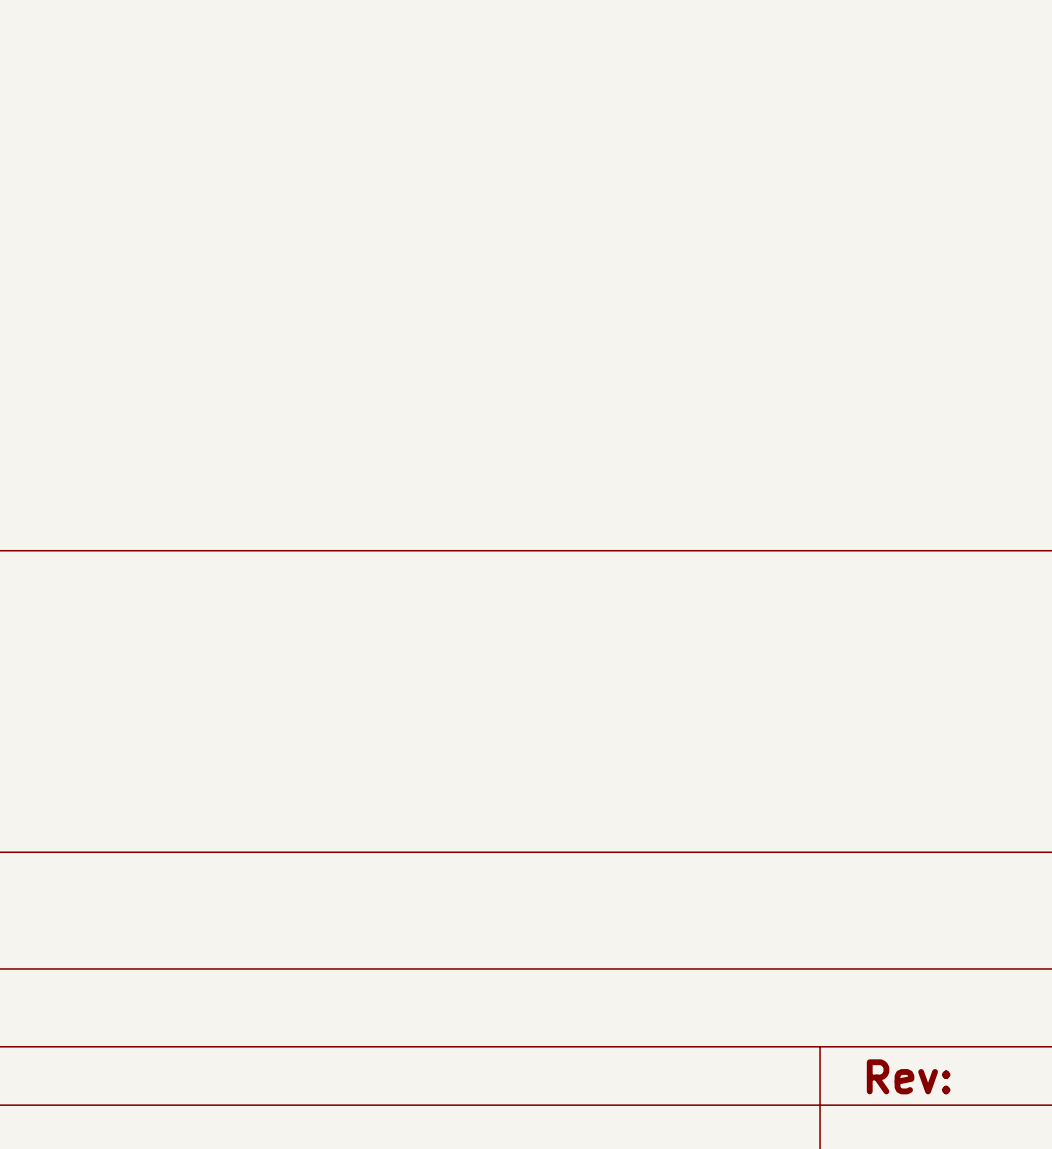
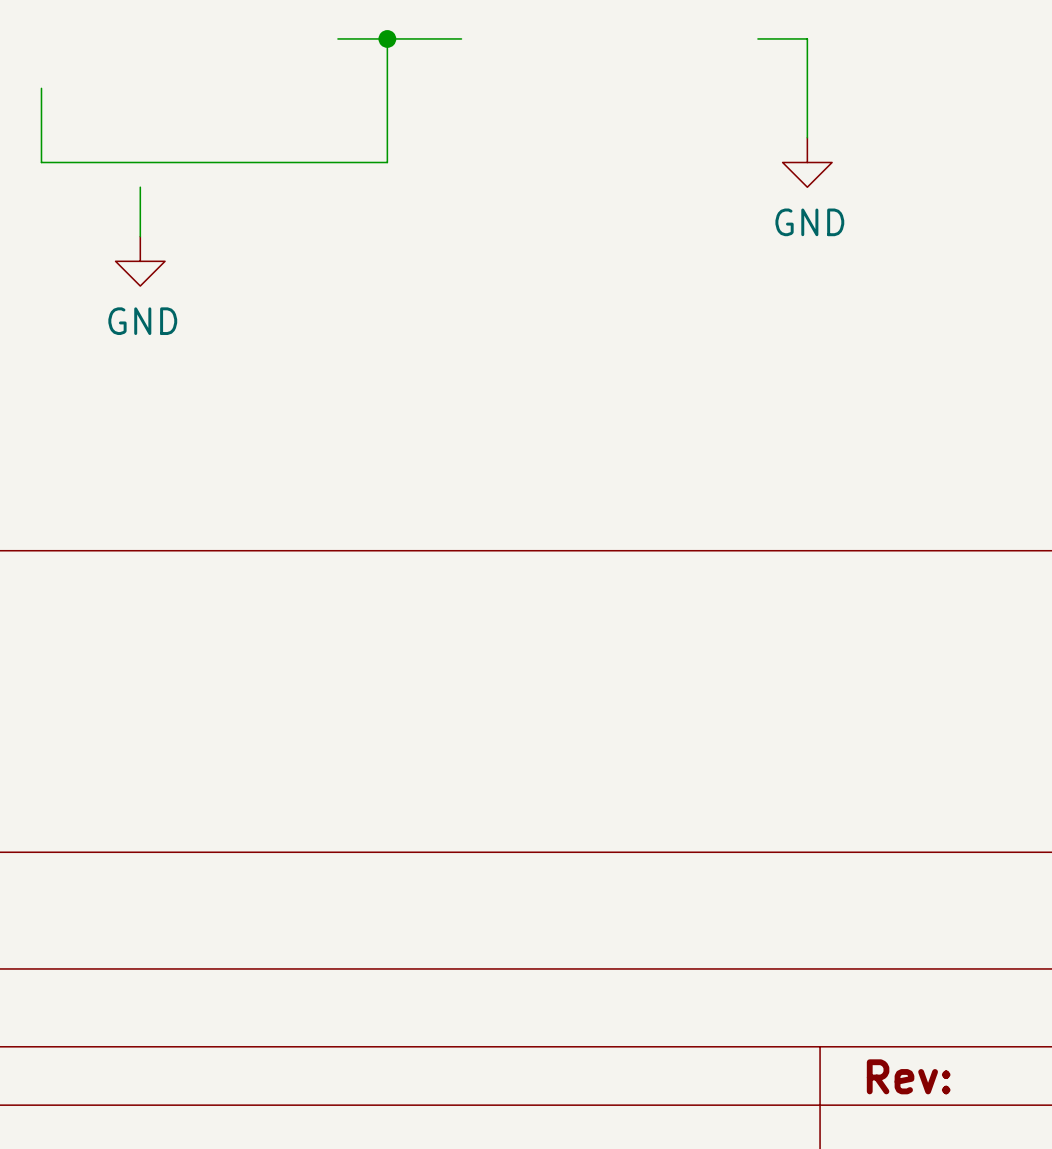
wire: none -> (337, 38) (461, 38)
wire: none -> (387, 38) (387, 162) (41, 162) (41, 88)
junction: none -> (387, 38)
wire: none -> (757, 38) (807, 38) (807, 137)
power symbol: none -> GND (807, 162)
wire: none -> (140, 187) (140, 236)
power symbol: none -> GND (140, 261)

